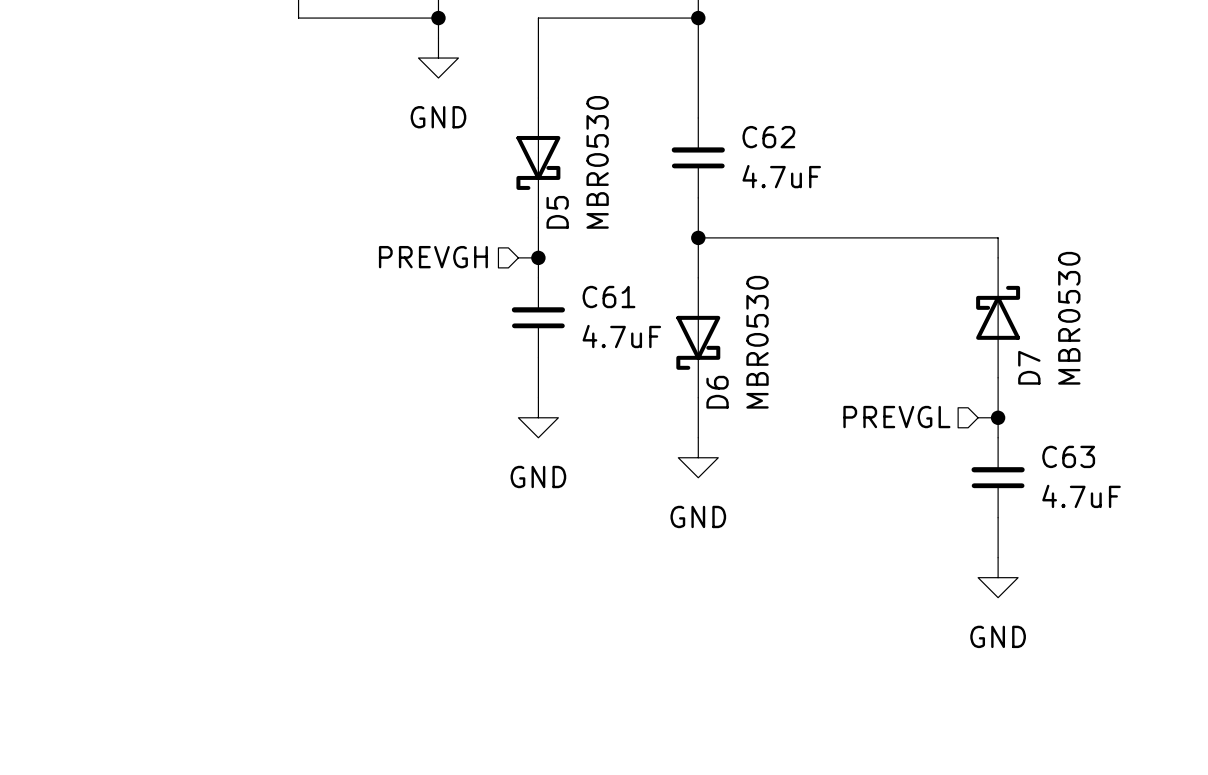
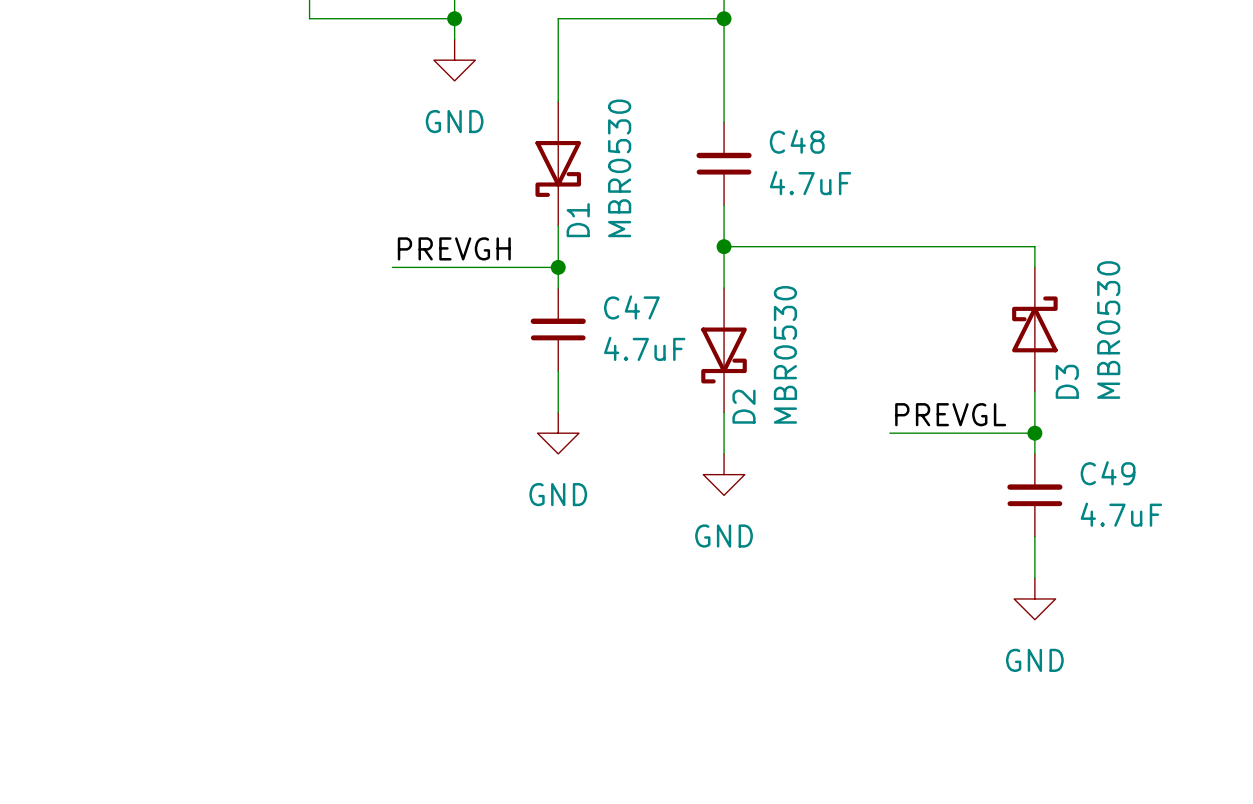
C62 name: C62 (768, 137) -> C48 (797, 141)
D5 name: D5 (557, 212) -> D1 (578, 220)
label: none -> PREVGH (454, 248)
wire: none -> (392, 267) (537, 267)
hierarchical label: PREVGH (433, 257) -> none
C61 name: C61 (608, 297) -> C47 (631, 307)
D7 name: D7 (1029, 367) -> D3 (1067, 381)
D6 name: D6 (717, 392) -> D2 (743, 406)
label: none -> PREVGL (950, 414)
wire: none -> (889, 433) (1014, 433)
hierarchical label: PREVGL (896, 417) -> none
C63 name: C63 (1068, 456) -> C49 (1108, 473)

